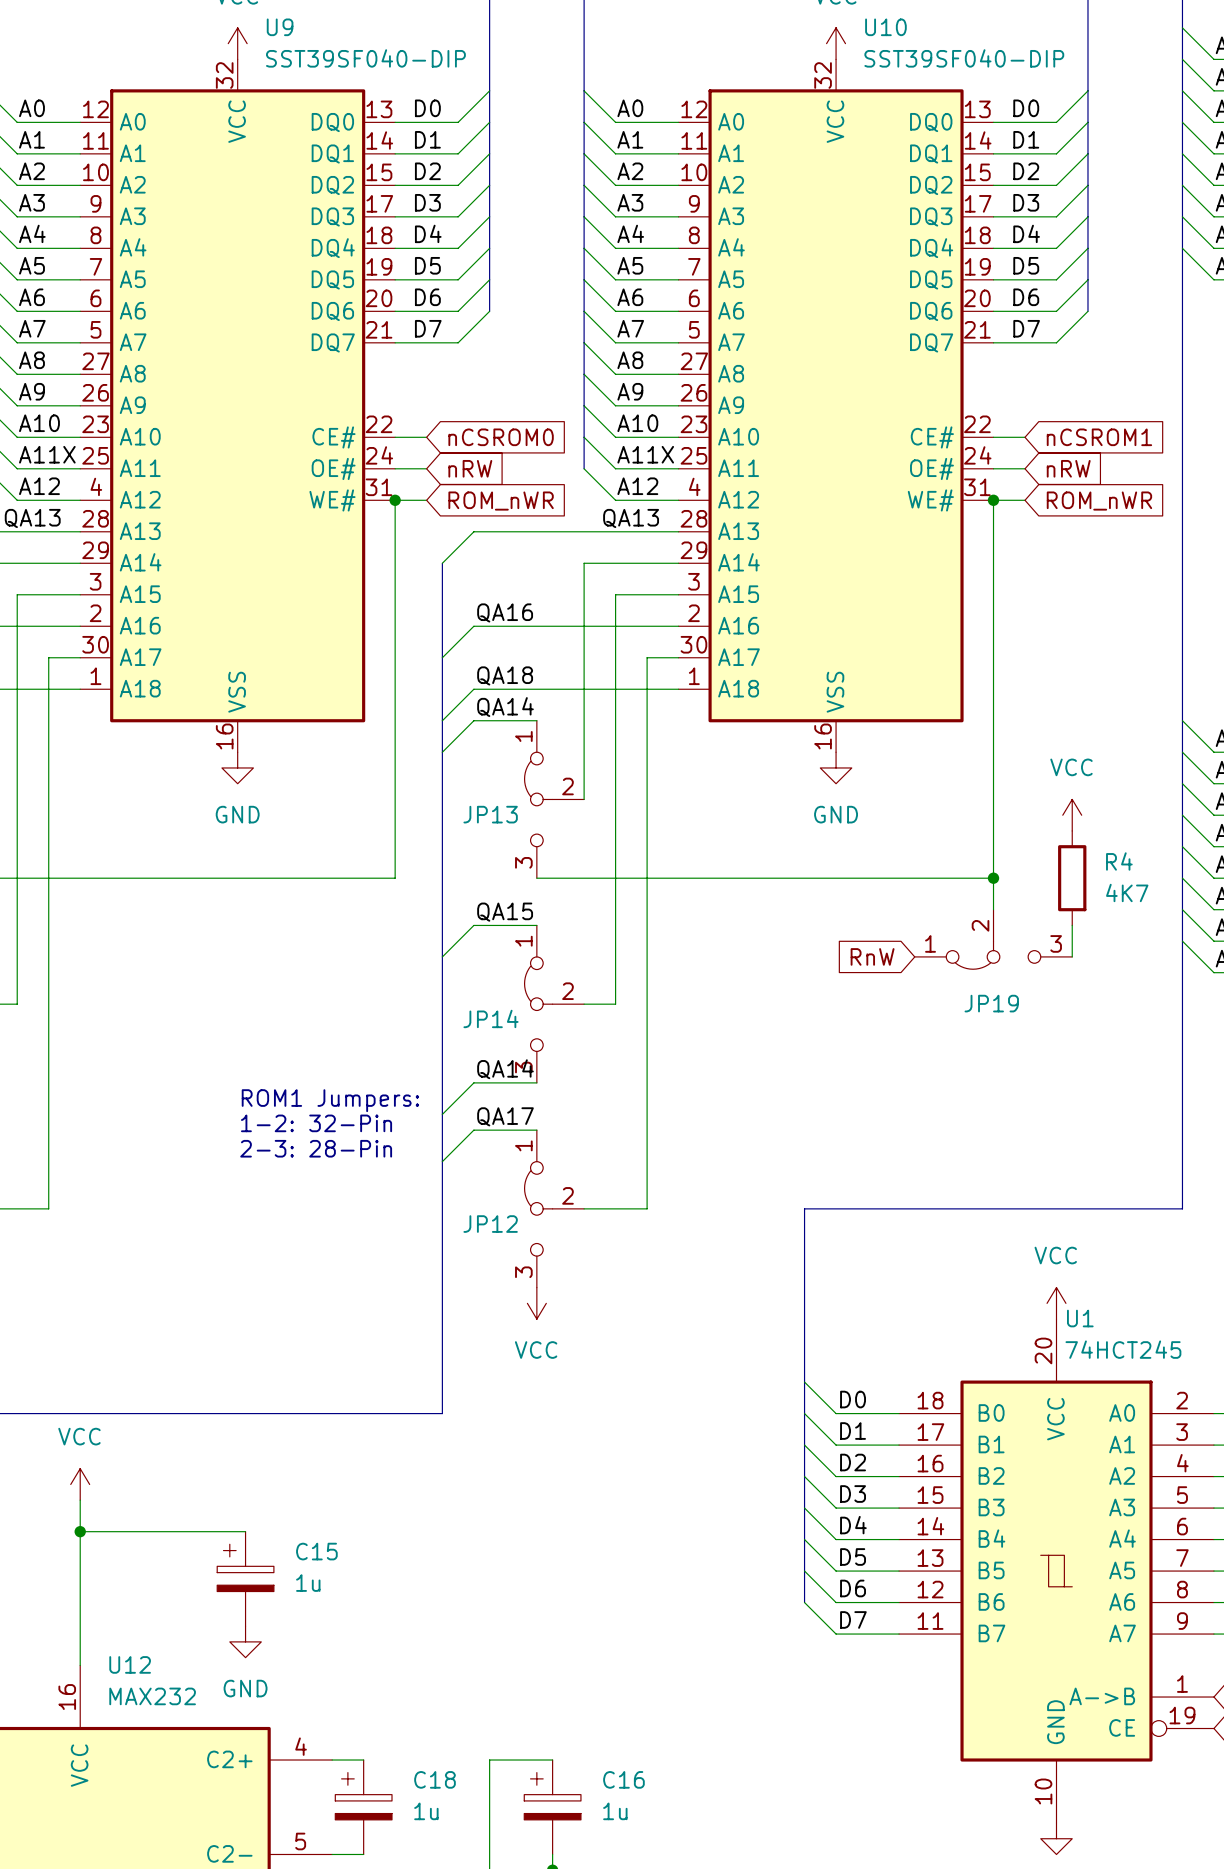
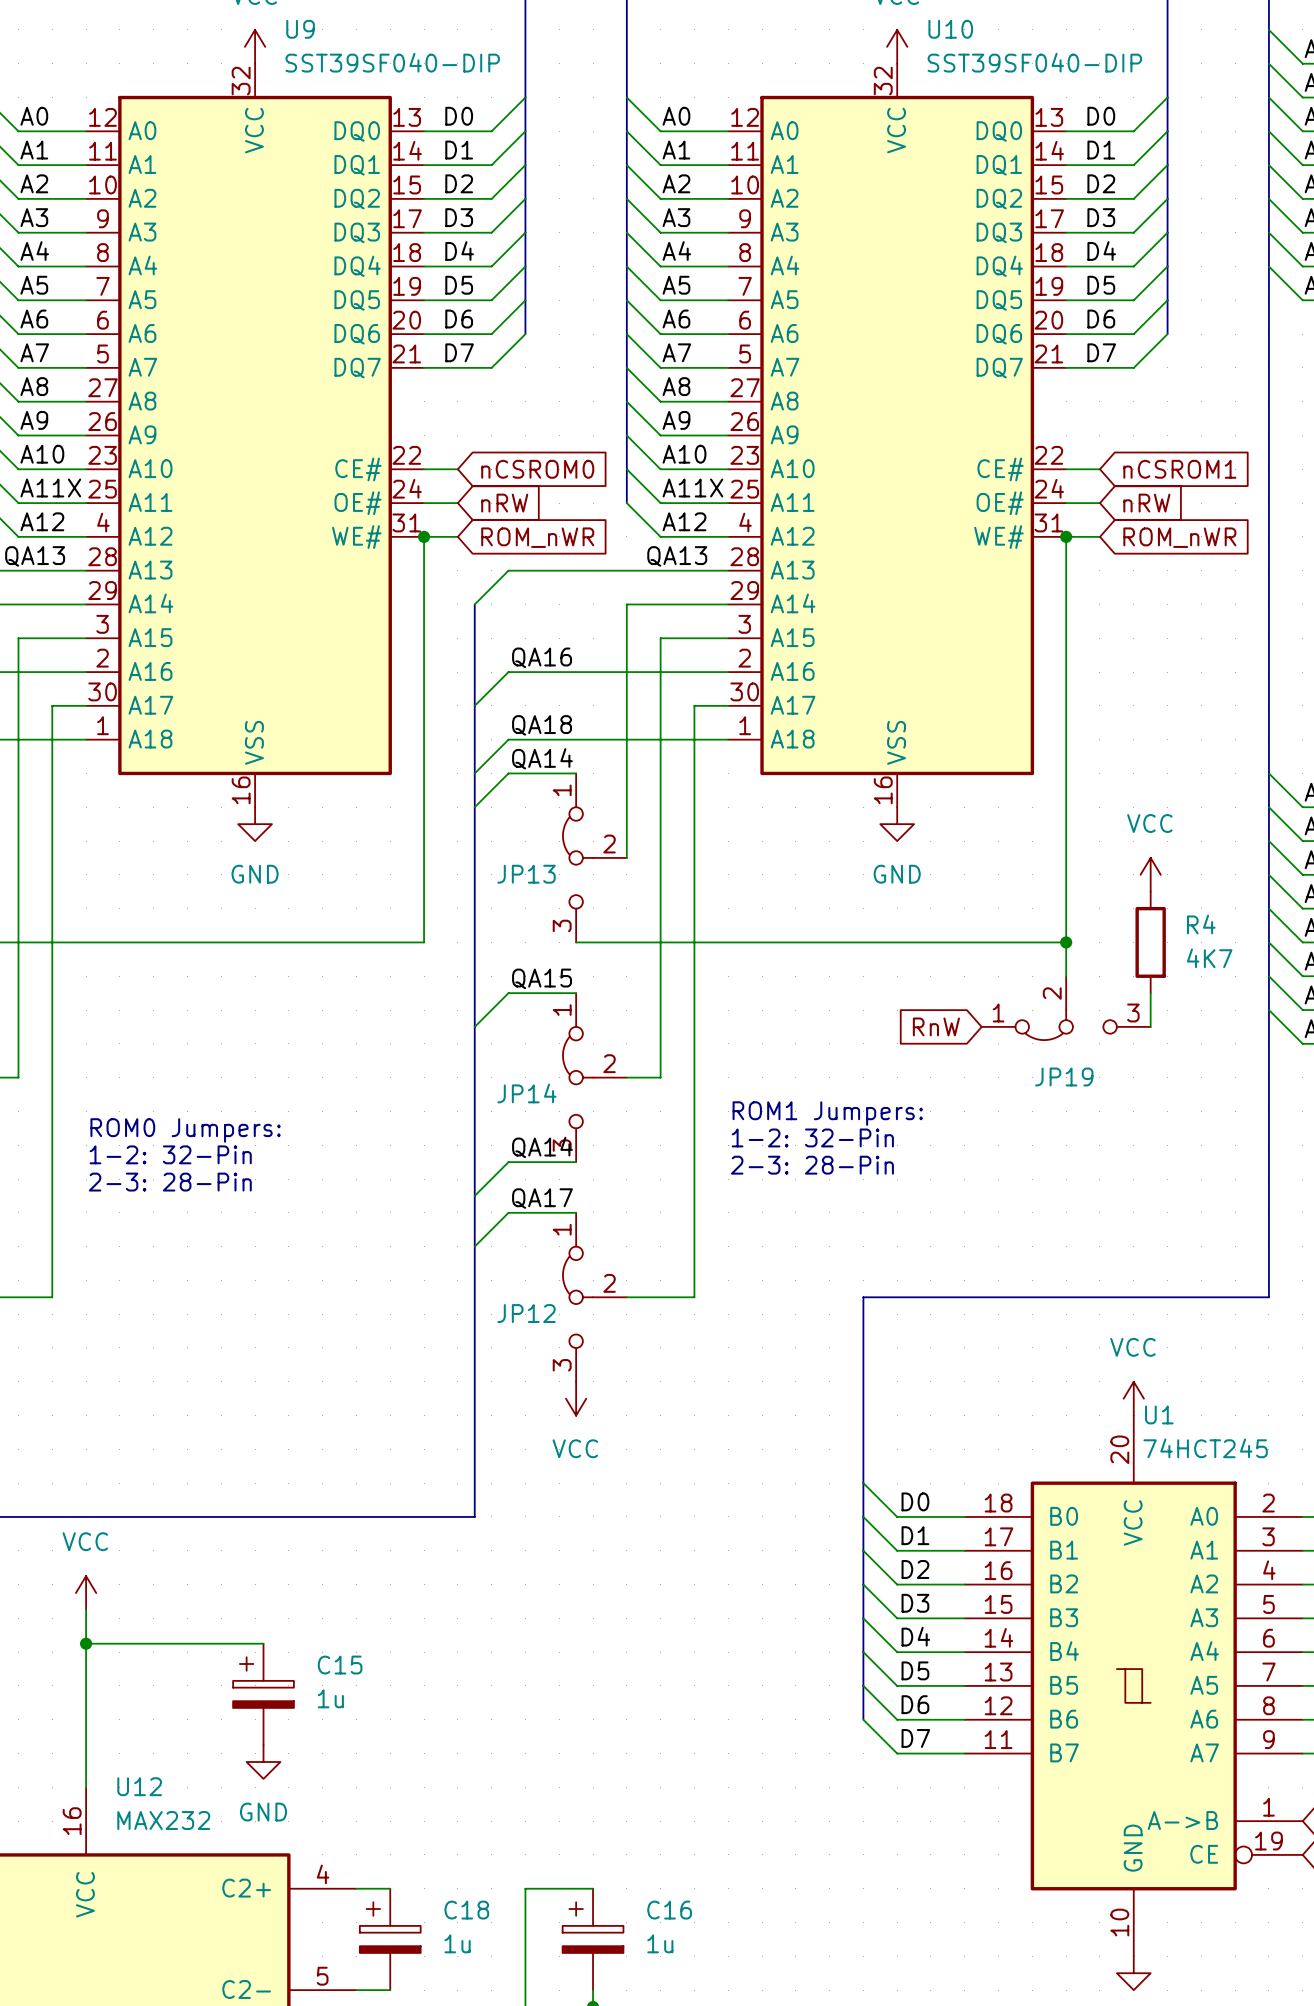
text: none -> ROM1 Jumpers: (827, 1113)
text: none -> ROM0 Jumpers: (185, 1130)
text: none -> 1-2: 32-Pin (812, 1137)
text: none -> 2-3: 28-Pin (812, 1165)
text: ROM1 Jumpers: (330, 1100) -> none
text position: 1-2: 32-Pin (316, 1123) -> 1-2: 32-Pin (170, 1154)
text position: 2-3: 28-Pin (316, 1148) -> 2-3: 28-Pin (170, 1182)

